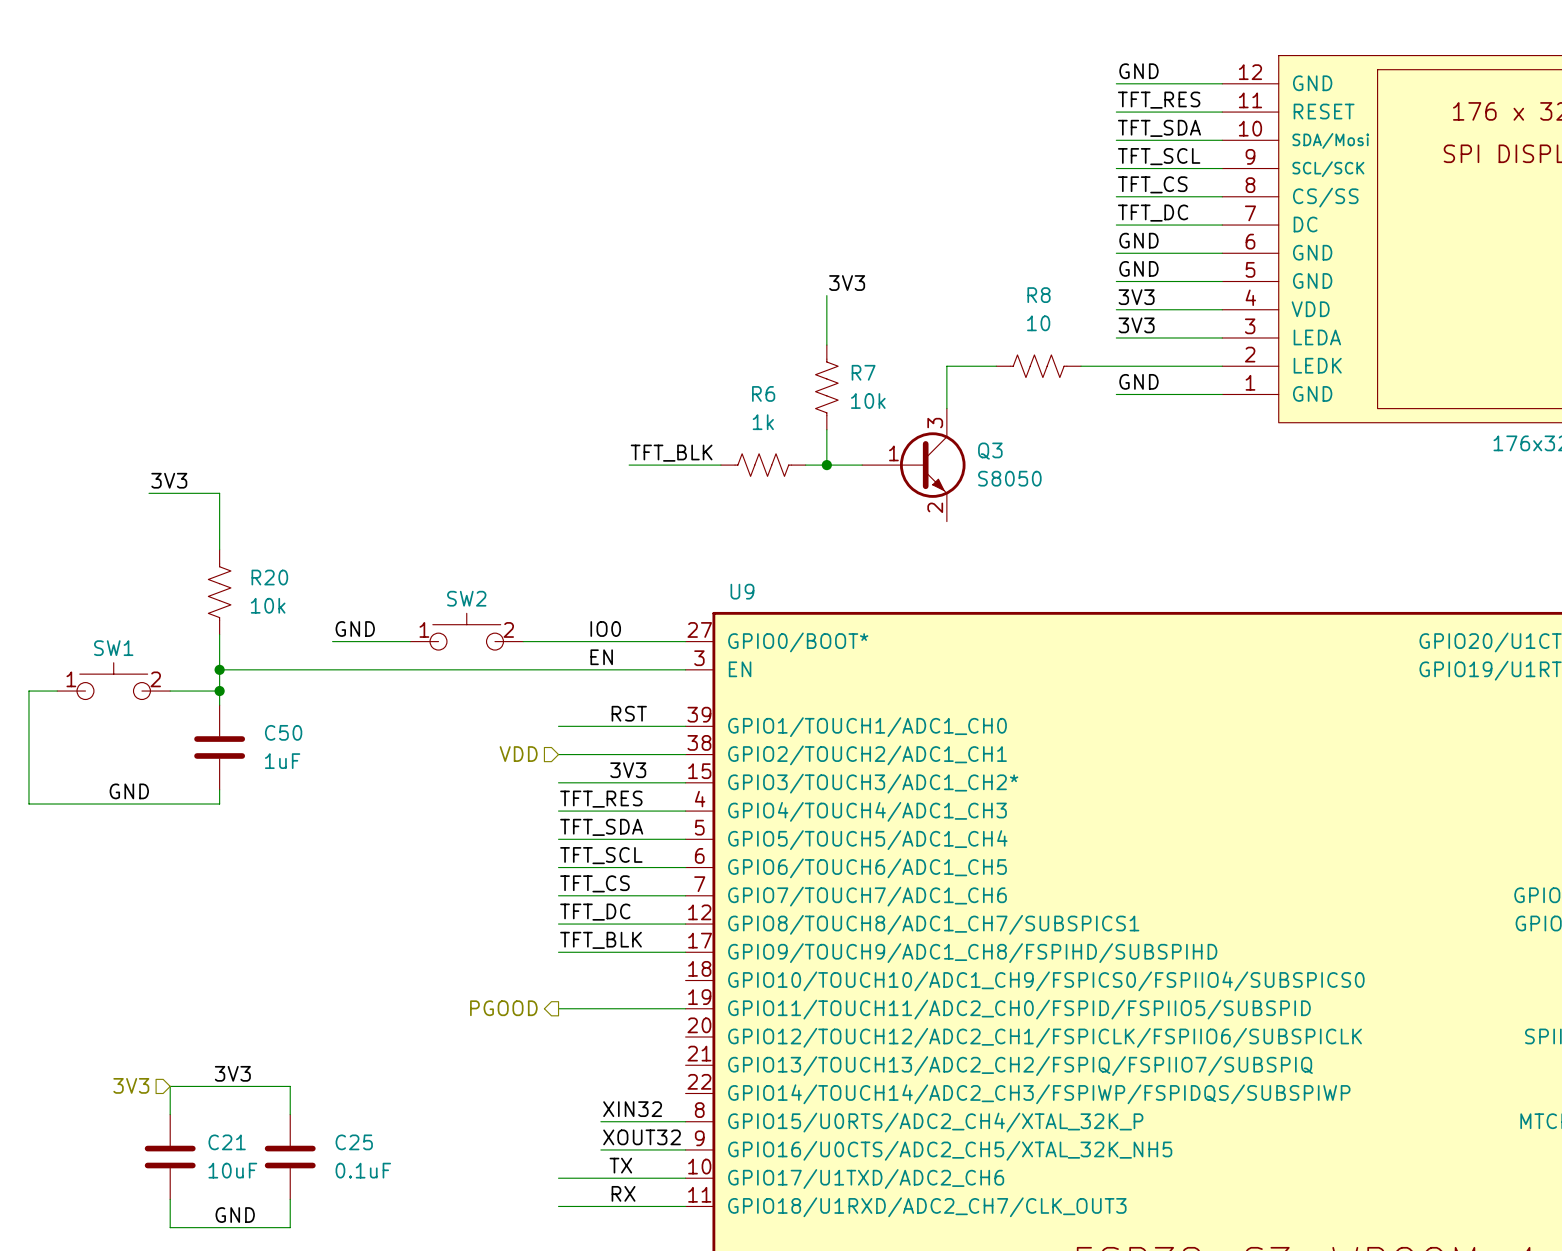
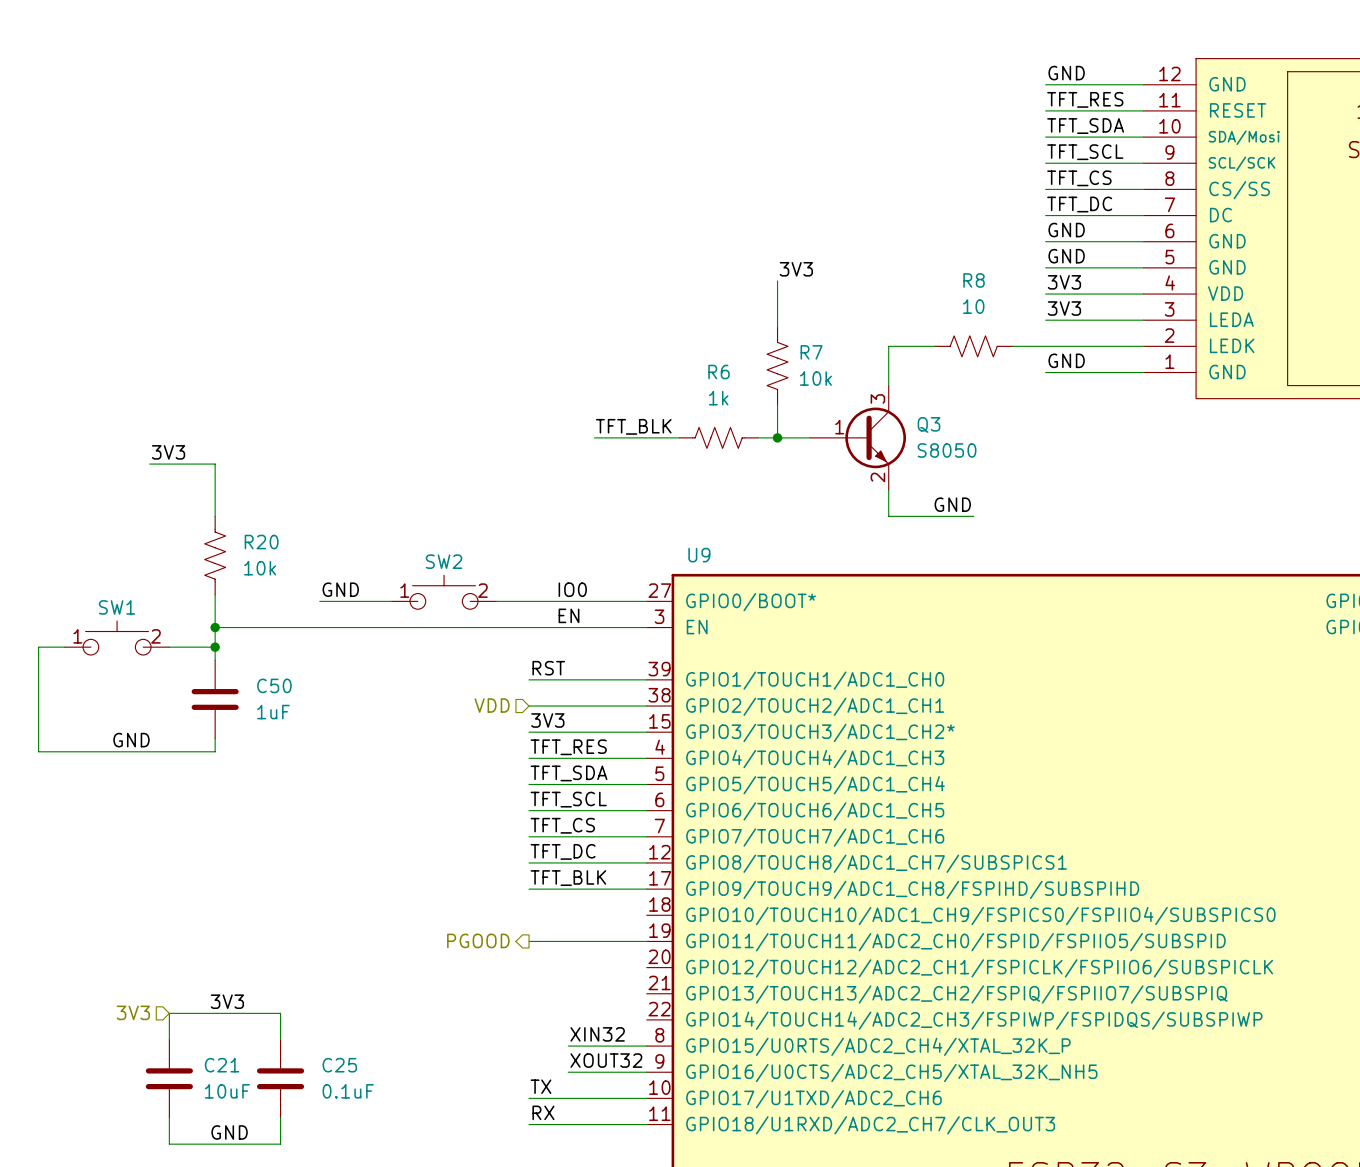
wire: none -> (888, 490) (888, 516) (973, 516)
label: none -> GND (952, 504)
label position: RST (629, 713) -> RST (548, 668)
label position: 3V3 (628, 770) -> 3V3 (547, 720)
label position: TX (620, 1165) -> TX (540, 1086)
label position: RX (623, 1193) -> RX (543, 1112)

